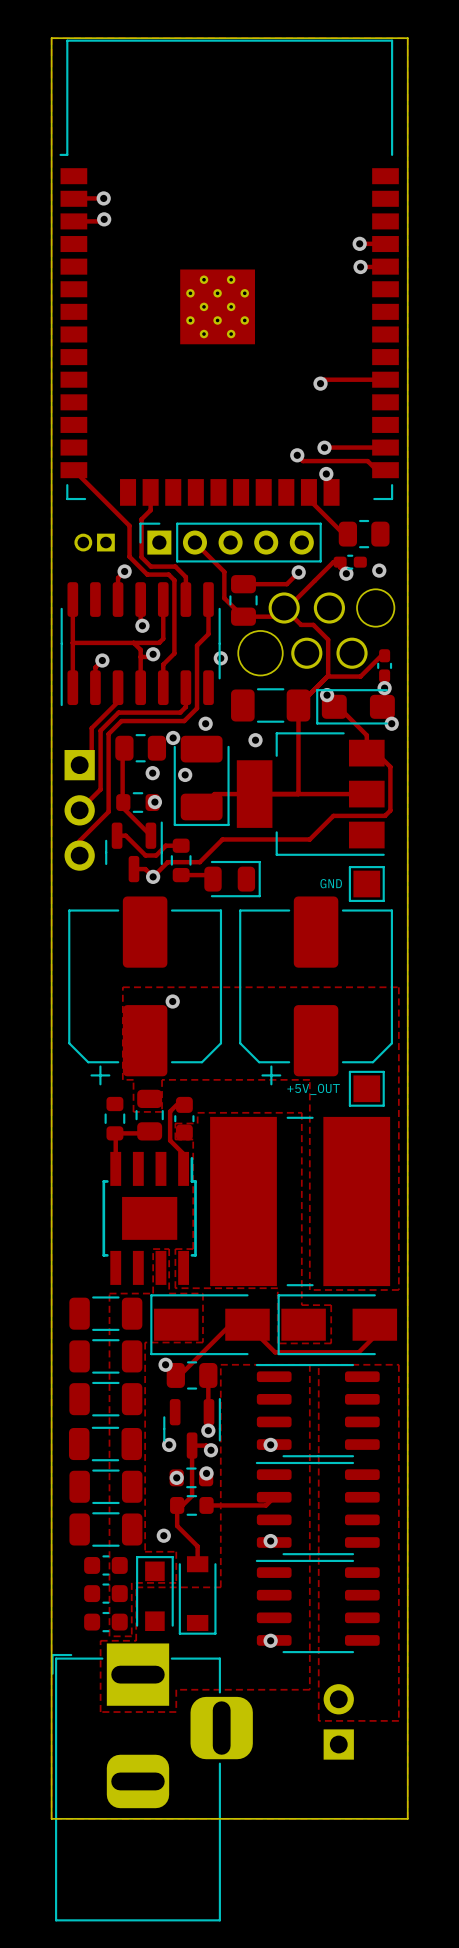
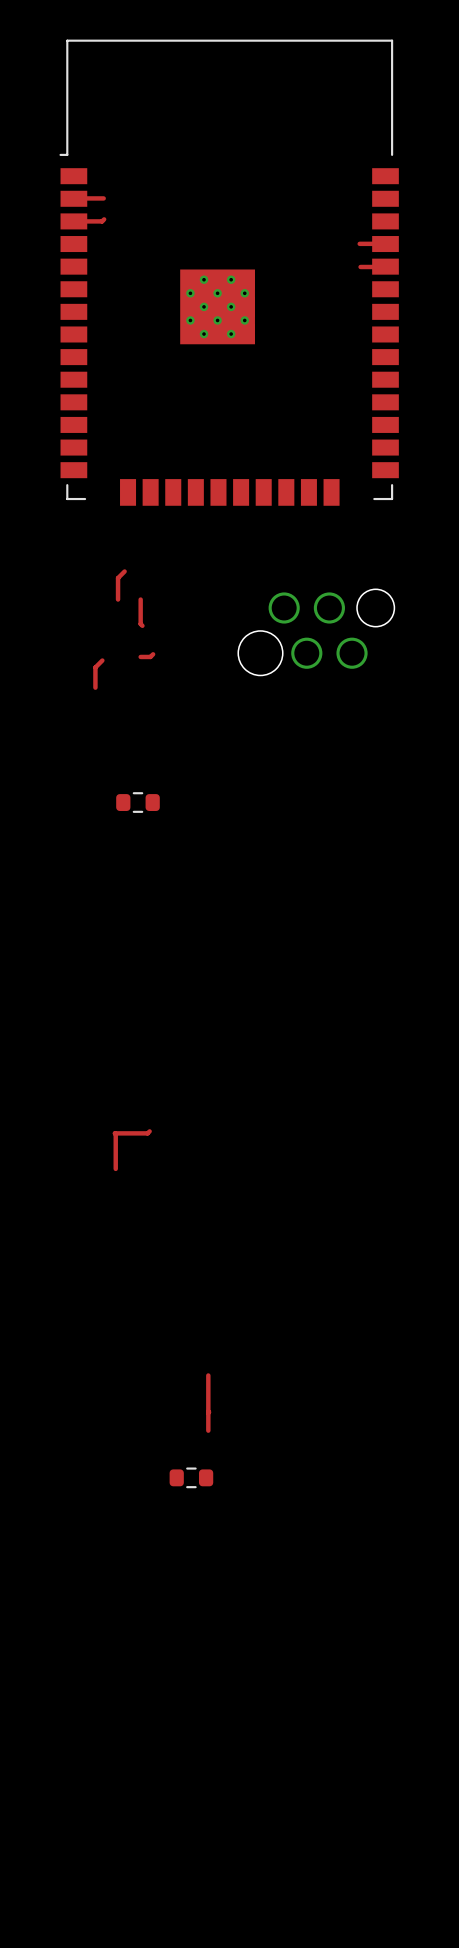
board edge: (51, 38) (407, 38) (407, 1818) (51, 1818) (51, 38) -> none
via: (103, 198) -> none
via: (104, 219) -> none
via: (359, 243) -> none
via: (360, 266) -> none
track: (385, 379) (324, 379) (320, 383) -> none
via: (320, 383) -> none
track: (324, 447) (385, 447) -> none
via: (324, 447) -> none
track: (297, 455) (303, 461) (367, 461) (376, 470) (385, 470) -> none
via: (297, 455) -> none
track: (73, 470) (129, 525) (129, 556) (147, 574) (168, 574) (174, 580) (174, 653) (163, 664) (163, 687) -> none
via: (326, 473) -> none
track: (150, 492) (150, 510) (141, 519) (141, 557) (150, 566) (175, 566) (185, 577) (185, 599) -> none
track: (308, 492) (308, 499) (343, 534) (347, 534) -> none
part: (364, 534) -> none
part: (94, 542) -> none
track: (194, 542) (224, 571) (224, 598) (242, 616) (275, 616) (284, 607) -> none
part: (230, 542) -> none
part: (350, 562) -> none
via: (379, 570) -> none
via: (124, 571) -> none
track: (298, 572) (286, 584) (243, 584) -> none
via: (298, 572) -> none
track: (346, 573) (340, 567) (340, 562) (333, 562) (287, 607) (284, 607) -> none
via: (346, 573) -> none
track: (72, 599) (72, 687) -> none
track: (163, 599) (163, 638) (159, 642) (72, 642) -> none
track: (208, 599) (208, 634) (197, 645) (197, 708) (184, 721) (121, 721) (108, 733) (108, 811) (79, 840) (79, 855) -> none
part: (243, 600) -> none
track: (284, 607) (301, 624) (313, 624) (328, 639) (328, 675) (298, 705) (298, 794) -> none
via: (142, 625) -> none
track: (133, 642) (140, 649) (140, 687) -> none
part: (140, 644) -> none
via: (153, 654) -> none
track: (384, 655) (381, 655) (360, 676) (327, 676) -> none
via: (220, 658) -> none
via: (102, 660) -> none
part: (384, 665) -> none
track: (118, 687) (118, 701) (91, 728) (91, 751) (79, 765) -> none
track: (185, 687) (185, 707) (180, 712) (118, 712) (100, 730) (100, 789) (79, 810) -> none
via: (384, 688) -> none
track: (327, 695) (327, 699) (334, 706) (338, 706) (366, 735) (366, 753) (376, 753) (390, 766) (390, 810) (385, 815) (333, 815) (309, 839) (222, 839) (199, 862) (167, 862) (153, 876) (145, 869) (133, 869) -> none
via: (327, 695) -> none
part: (270, 705) -> none
part: (355, 706) -> none
via: (205, 723) -> none
via: (391, 723) -> none
via: (173, 737) -> none
via: (255, 740) -> none
track: (124, 748) (122, 750) (123, 808) (150, 835) -> none
part: (140, 748) -> none
via: (152, 773) -> none
via: (185, 774) -> none
part: (201, 780) -> none
part: (310, 794) -> none
track: (366, 794) (214, 794) (201, 806) -> none
via: (154, 802) -> none
part: (79, 810) -> none
track: (117, 835) (125, 835) (145, 855) (156, 855) (165, 845) (181, 845) -> none
part: (133, 851) -> none
part: (181, 860) -> none
track: (181, 875) (208, 875) (213, 879) -> none
via: (153, 876) -> none
part: (232, 879) -> none
text: GND (331, 883) -> none
part: (366, 884) -> none
zone outline: (122, 987) (122, 1079) (133, 1079) (133, 1111) (162, 1111) (162, 1079) (309, 1079) (309, 1289) (398, 1289) (398, 987) (122, 987) -> none
part: (145, 990) -> none
part: (316, 990) -> none
via: (172, 1001) -> none
part: (366, 1088) -> none
text: +5V_OUT (313, 1089) -> none
track: (176, 1104) (170, 1111) (170, 1140) (183, 1154) (183, 1168) -> none
zone outline: (197, 1112) (197, 1123) (175, 1123) (175, 1139) (193, 1139) (193, 1249) (175, 1249) (175, 1288) (277, 1288) (277, 1343) (331, 1343) (331, 1305) (301, 1305) (301, 1112) (197, 1112) -> none
part: (149, 1115) -> none
part: (114, 1118) -> none
part: (184, 1118) -> none
part: (300, 1201) -> none
part: (149, 1218) -> none
zone outline: (153, 1249) (169, 1249) (169, 1293) (202, 1293) (202, 1342) (145, 1342) (145, 1551) (176, 1551) (176, 1582) (131, 1582) (131, 1636) (109, 1636) (109, 1293) (153, 1293) (153, 1249) -> none
part: (105, 1313) -> none
part: (210, 1324) -> none
part: (337, 1324) -> none
track: (374, 1324) (374, 1336) (358, 1352) (275, 1352) (247, 1324) (230, 1324) (179, 1375) (175, 1375) -> none
part: (105, 1356) -> none
via: (165, 1364) -> none
zone outline: (220, 1364) (220, 1587) (136, 1587) (136, 1640) (100, 1640) (100, 1712) (176, 1712) (176, 1689) (309, 1689) (309, 1364) (220, 1364) -> none
zone outline: (318, 1364) (398, 1364) (398, 1720) (318, 1720) (318, 1364) -> none
part: (192, 1375) -> none
part: (105, 1399) -> none
part: (317, 1410) -> none
part: (192, 1428) -> none
via: (208, 1430) -> none
part: (105, 1444) -> none
via: (169, 1444) -> none
via: (270, 1444) -> none
track: (210, 1450) (206, 1445) (192, 1445) (192, 1495) (182, 1505) (177, 1505) (177, 1525) (197, 1546) (197, 1564) -> none
via: (210, 1450) -> none
via: (206, 1473) -> none
via: (176, 1477) -> none
part: (105, 1486) -> none
track: (274, 1497) (266, 1505) (206, 1505) -> none
part: (191, 1505) -> none
part: (317, 1508) -> none
part: (105, 1529) -> none
via: (163, 1535) -> none
via: (270, 1541) -> none
part: (105, 1565) -> none
part: (105, 1593) -> none
part: (154, 1593) -> none
part: (197, 1595) -> none
part: (317, 1606) -> none
part: (105, 1622) -> none
via: (270, 1640) -> none
part: (338, 1721) -> none
part: (152, 1782) -> none

